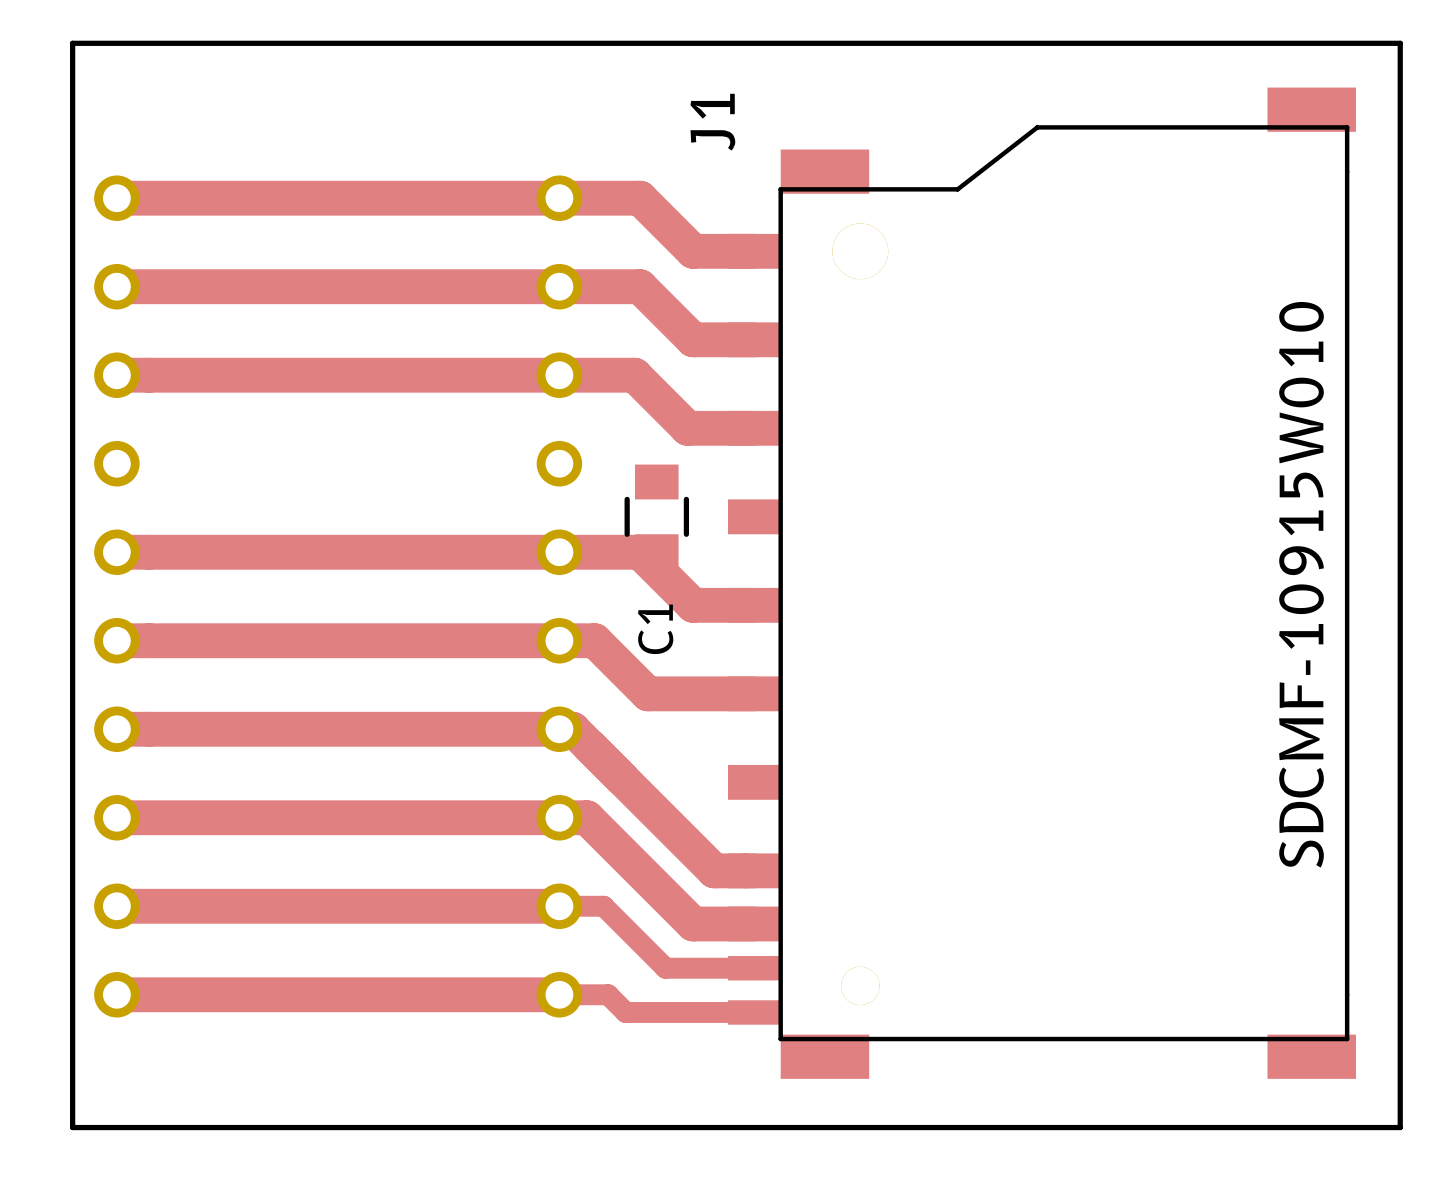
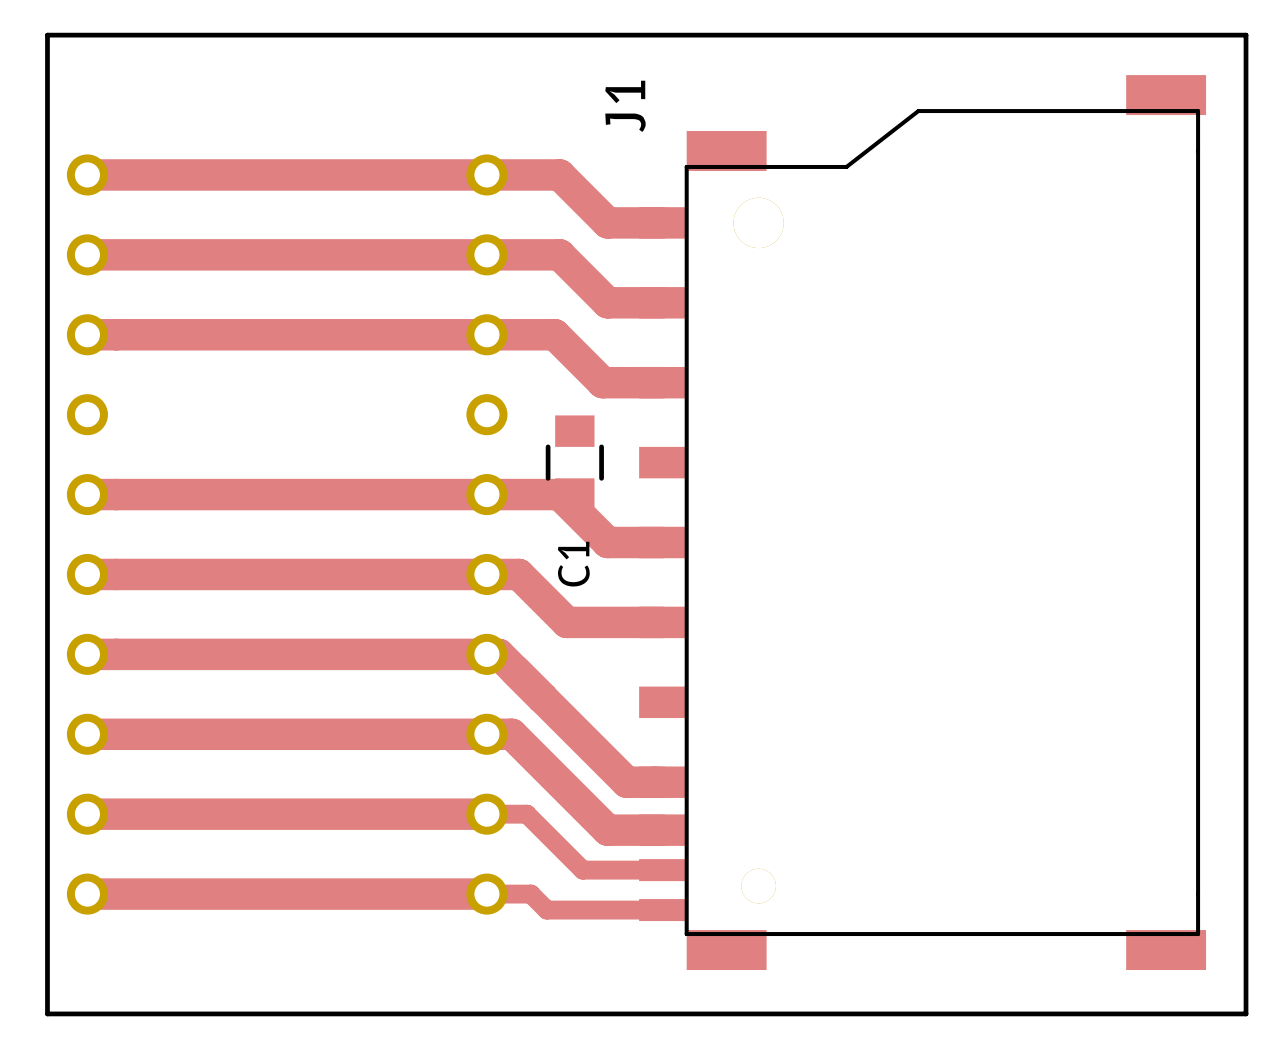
J1 value: SDCMF-10915W010 (1301, 584) -> none

